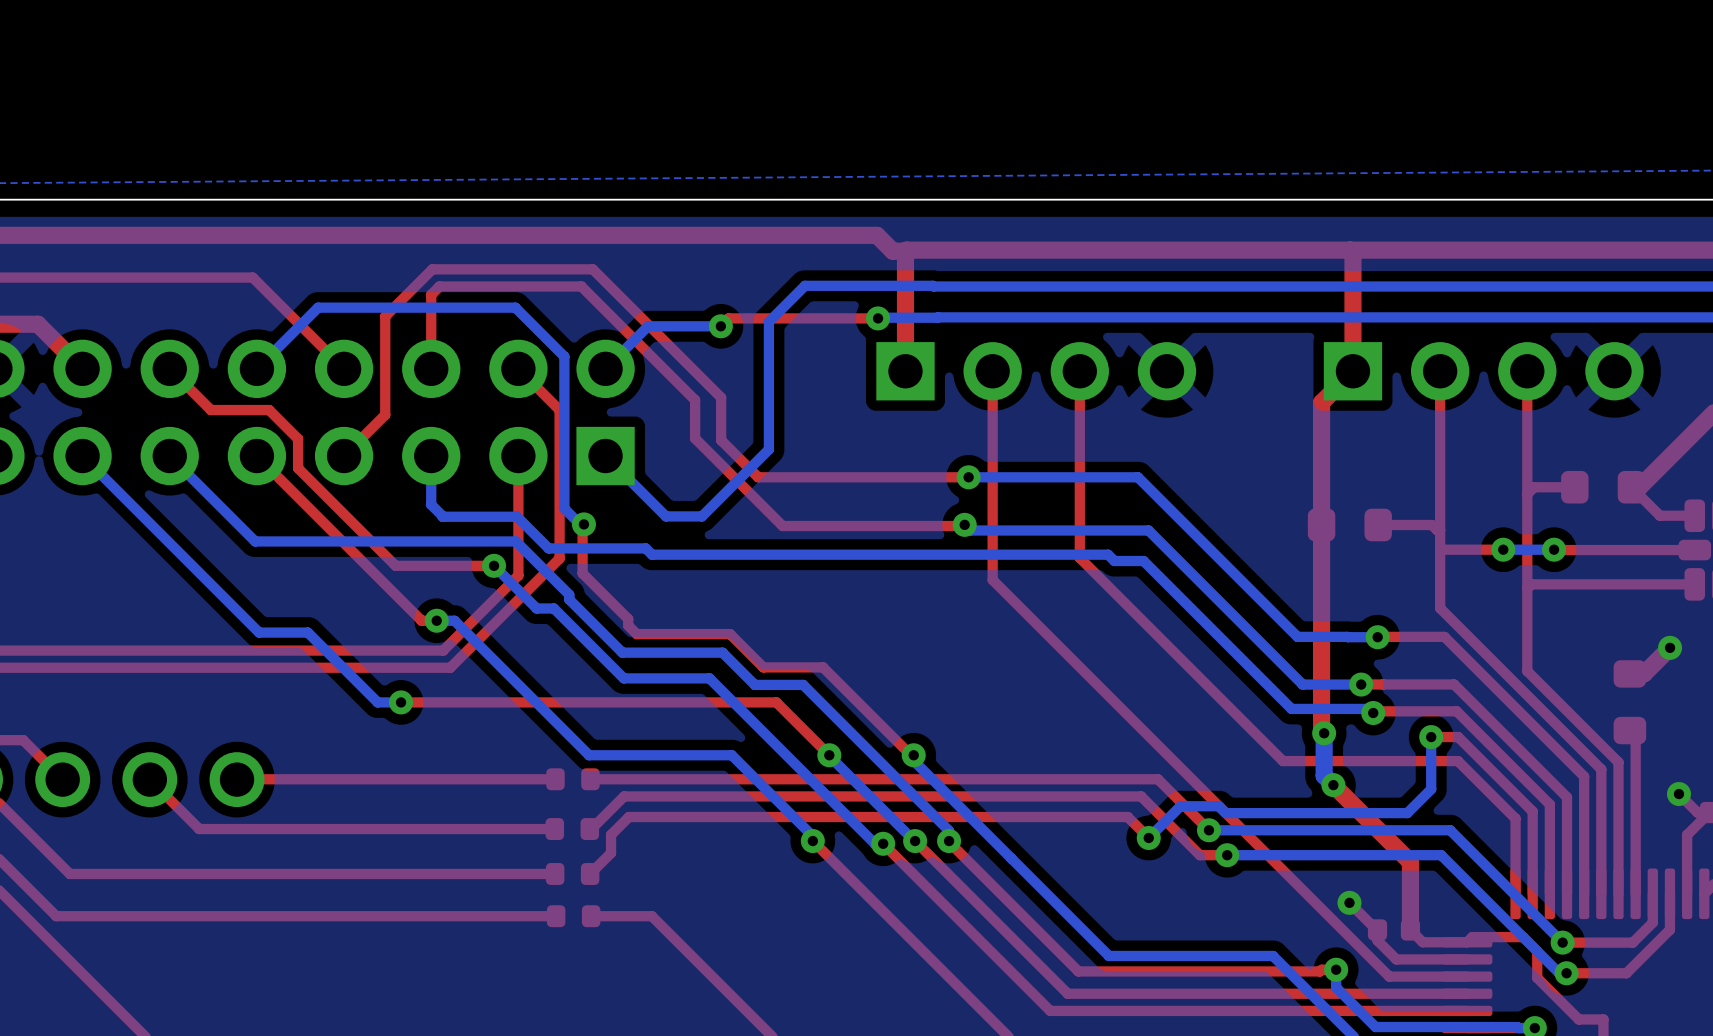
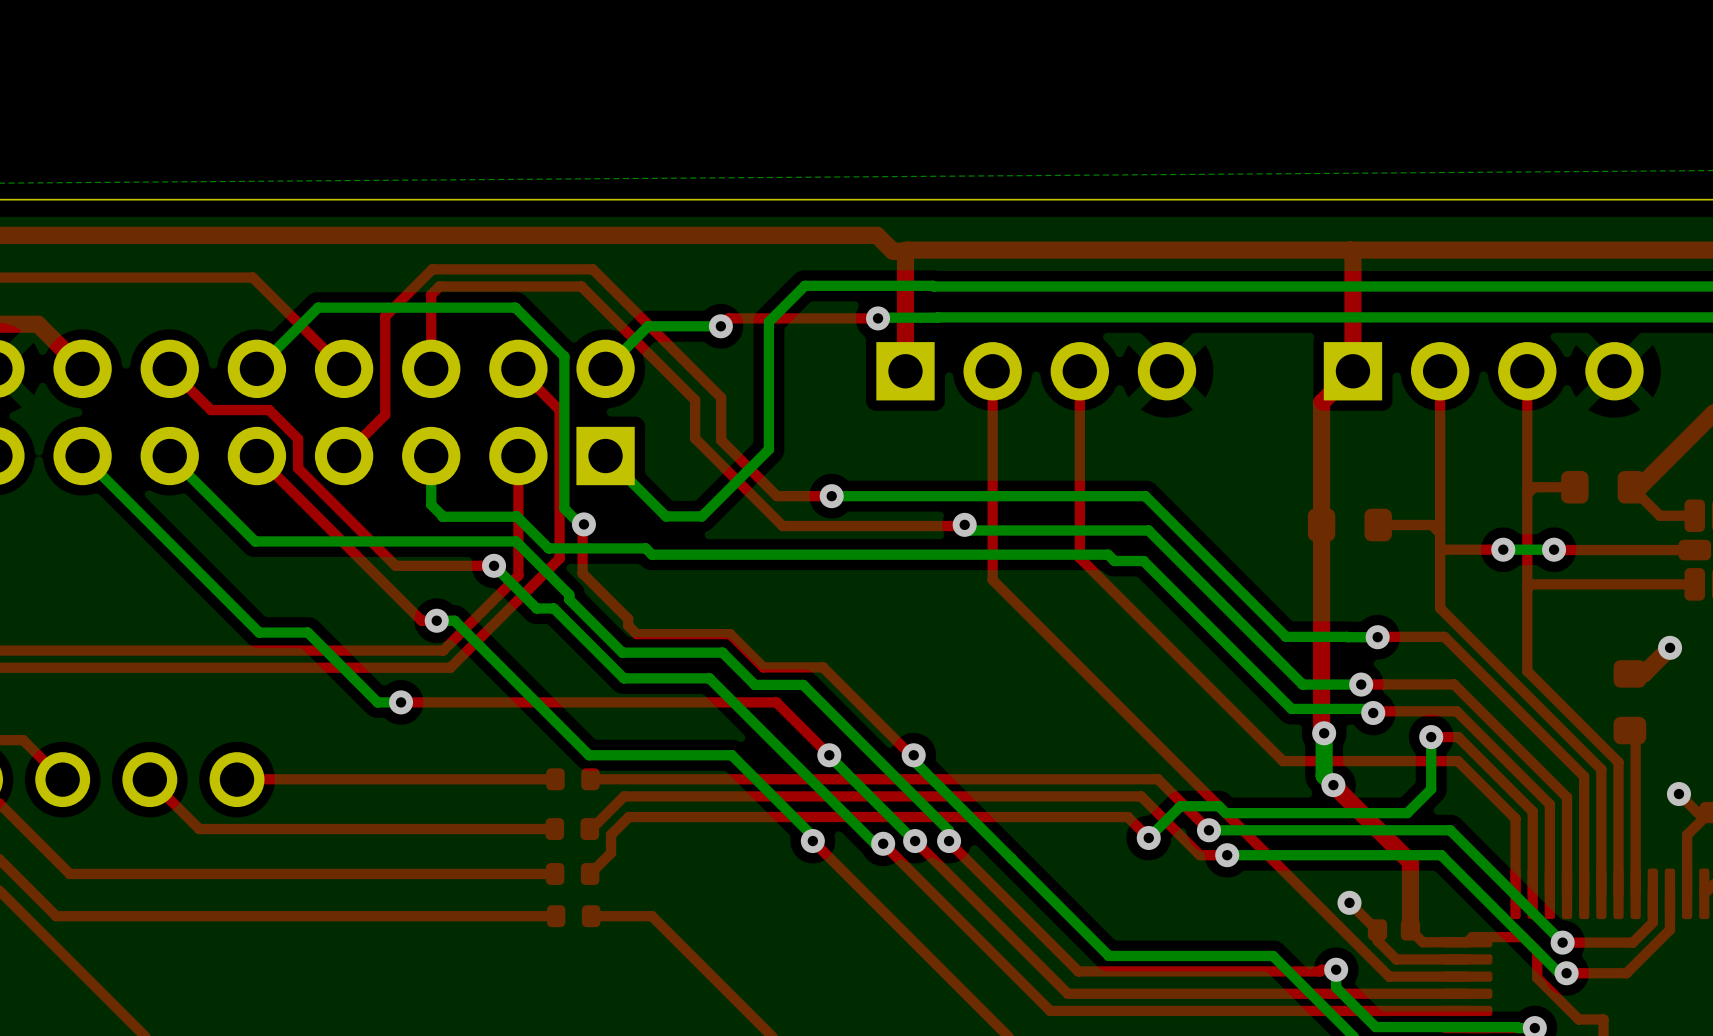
top track: (968, 477) (758, 477) -> (831, 496) (777, 496) (758, 477)
bottom track: (968, 477) (1137, 477) (1297, 636) -> (831, 496) (1145, 496) (1286, 636) (1297, 636)
via position: (968, 477) -> (831, 496)

